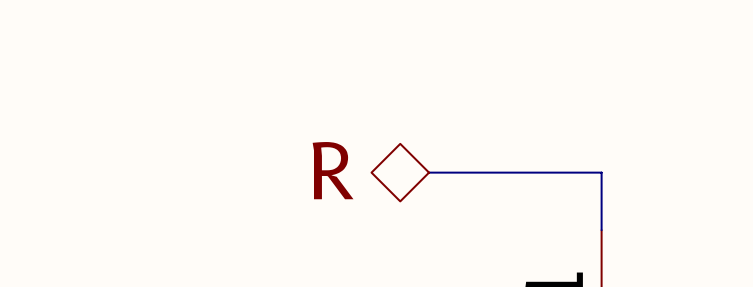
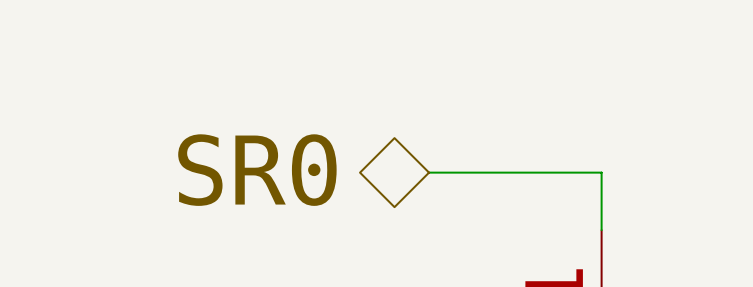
hierarchical label: R (333, 170) -> SR0 (257, 170)

